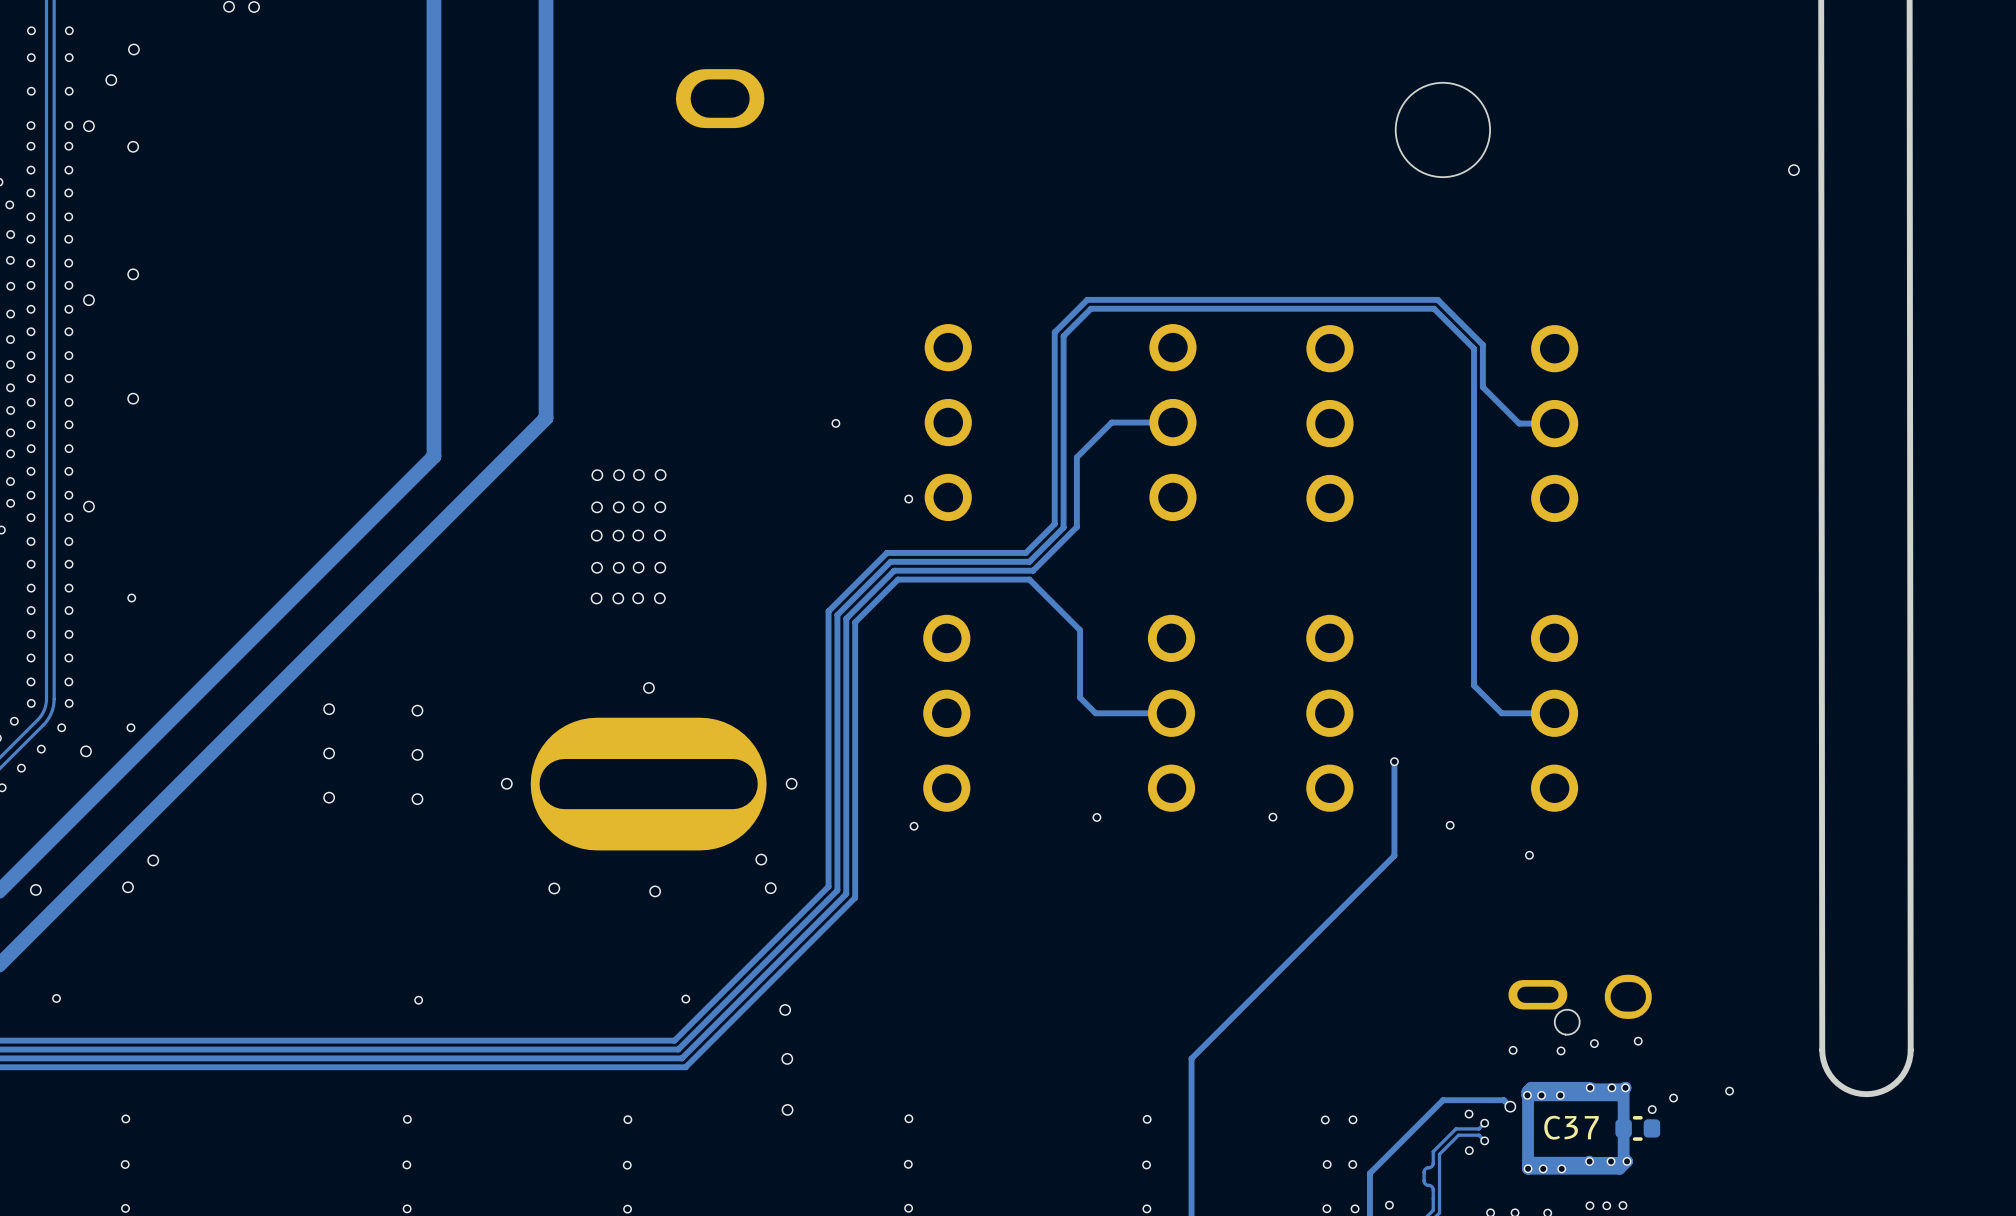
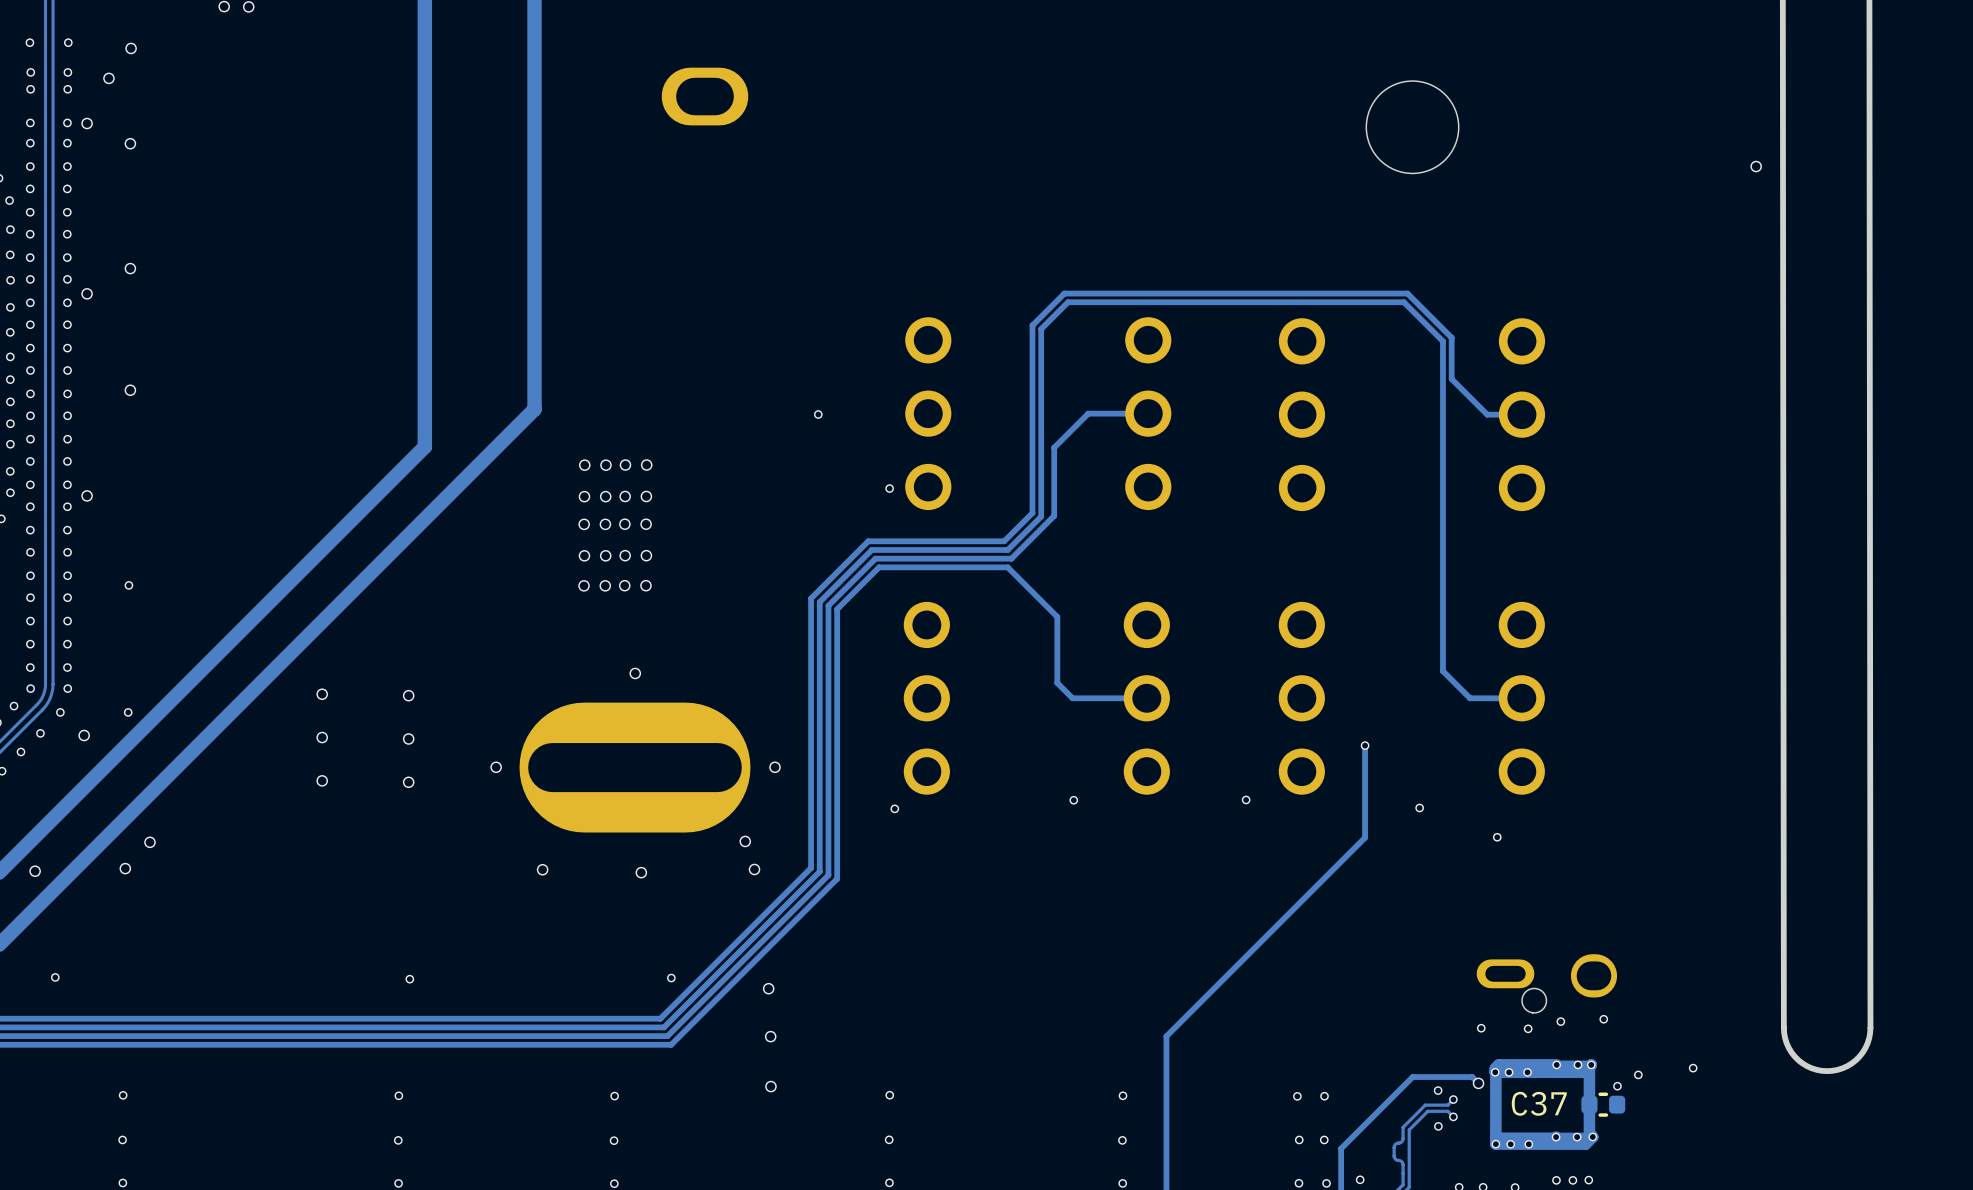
via: (31, 30) -> none
via: (69, 30) -> none
via: none -> (29, 42)
via: none -> (68, 42)
via: (31, 57) -> none
via: (69, 57) -> none
via: none -> (30, 72)
via: none -> (67, 72)

